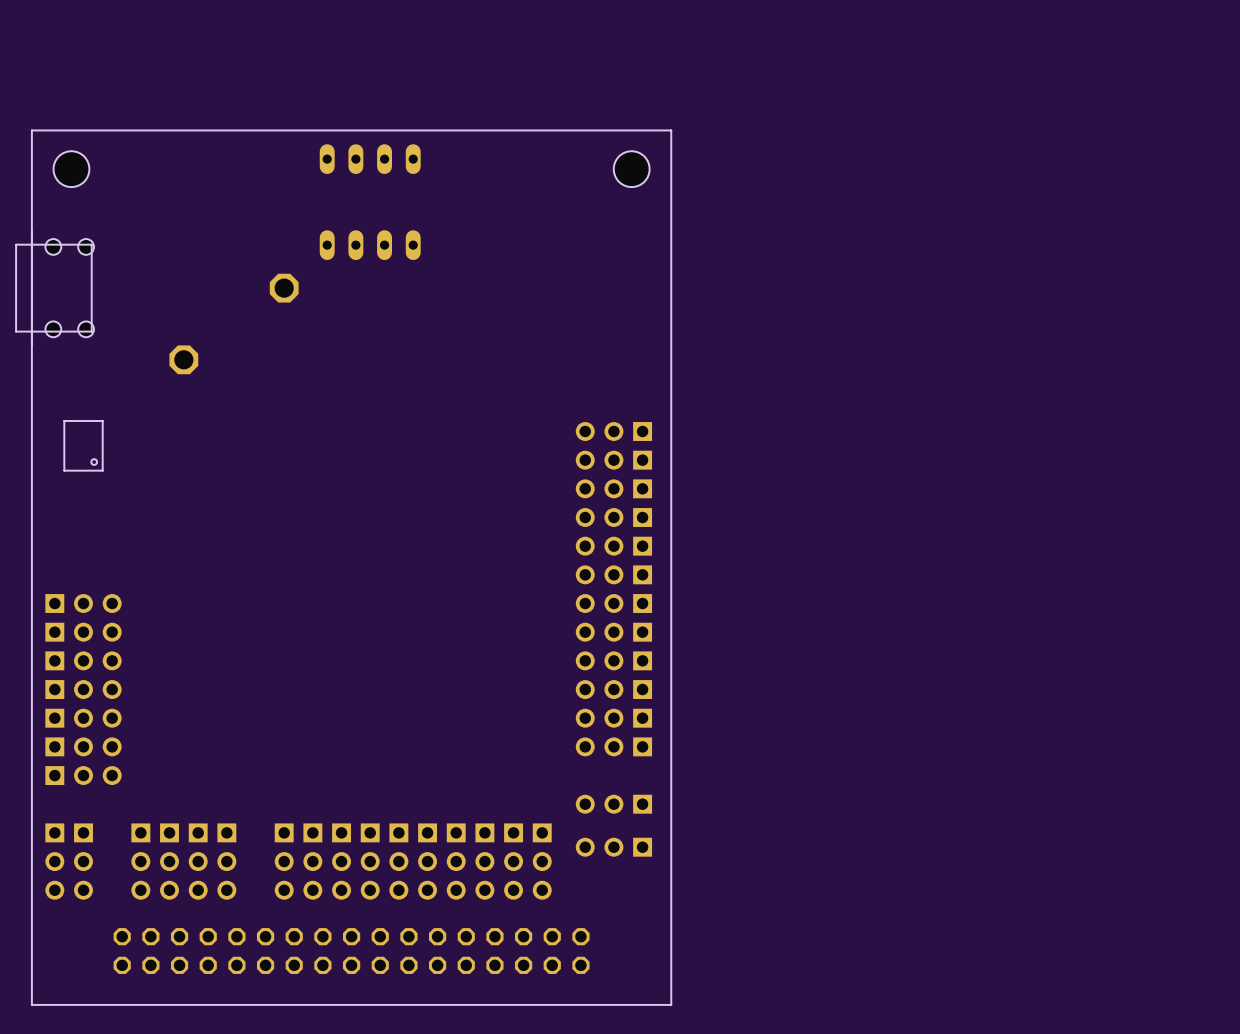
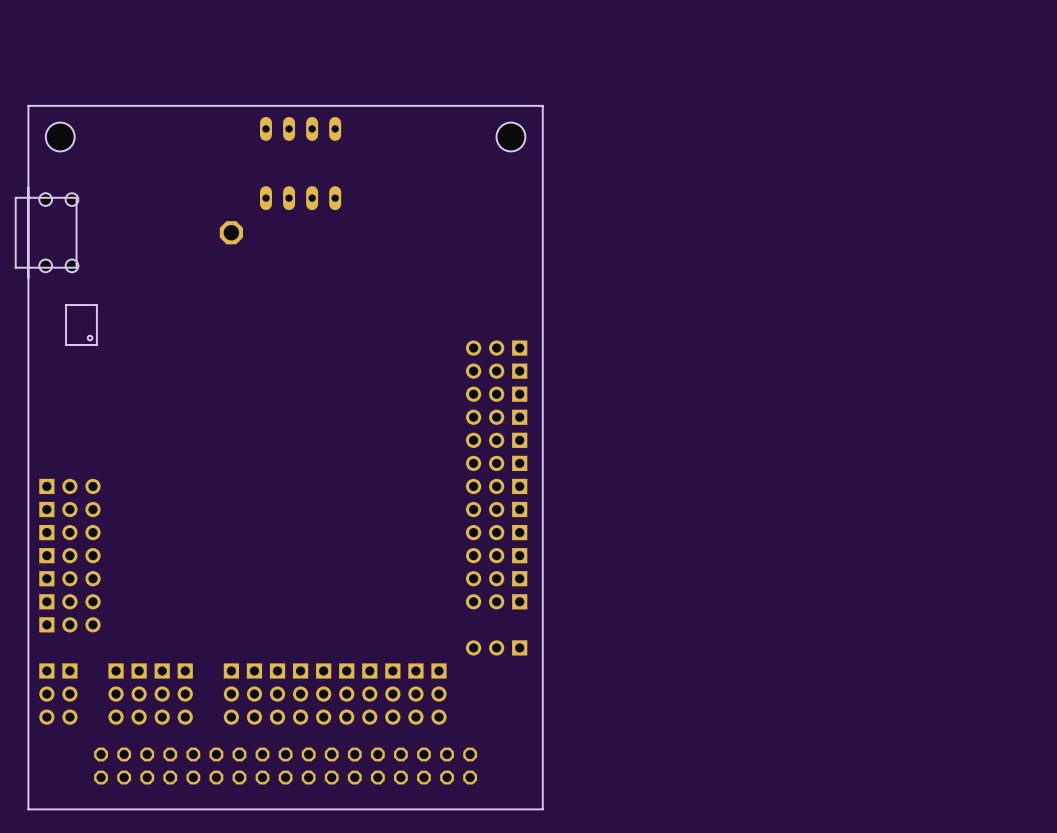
part: (183, 359) -> none
part position: (83, 445) -> (81, 324)
part: (613, 847) -> none

